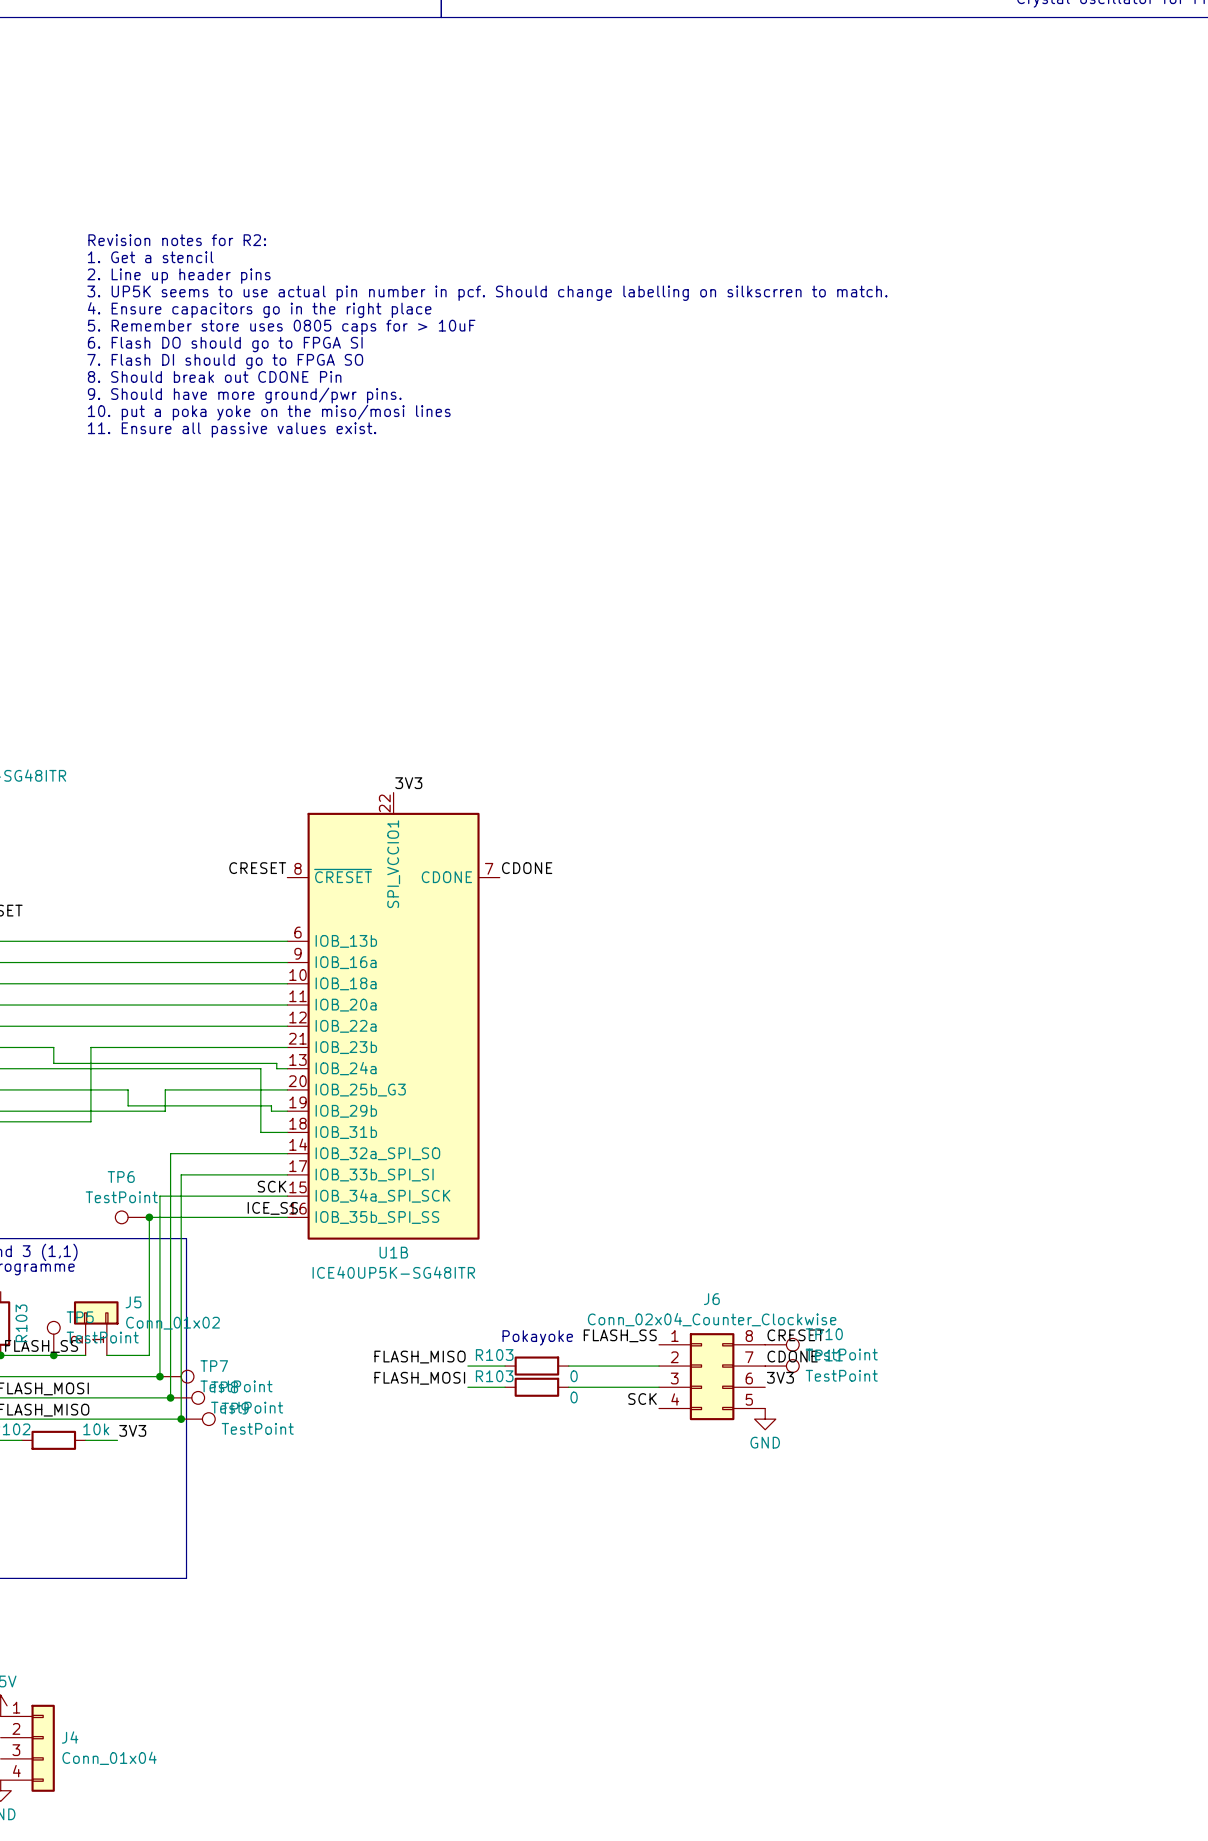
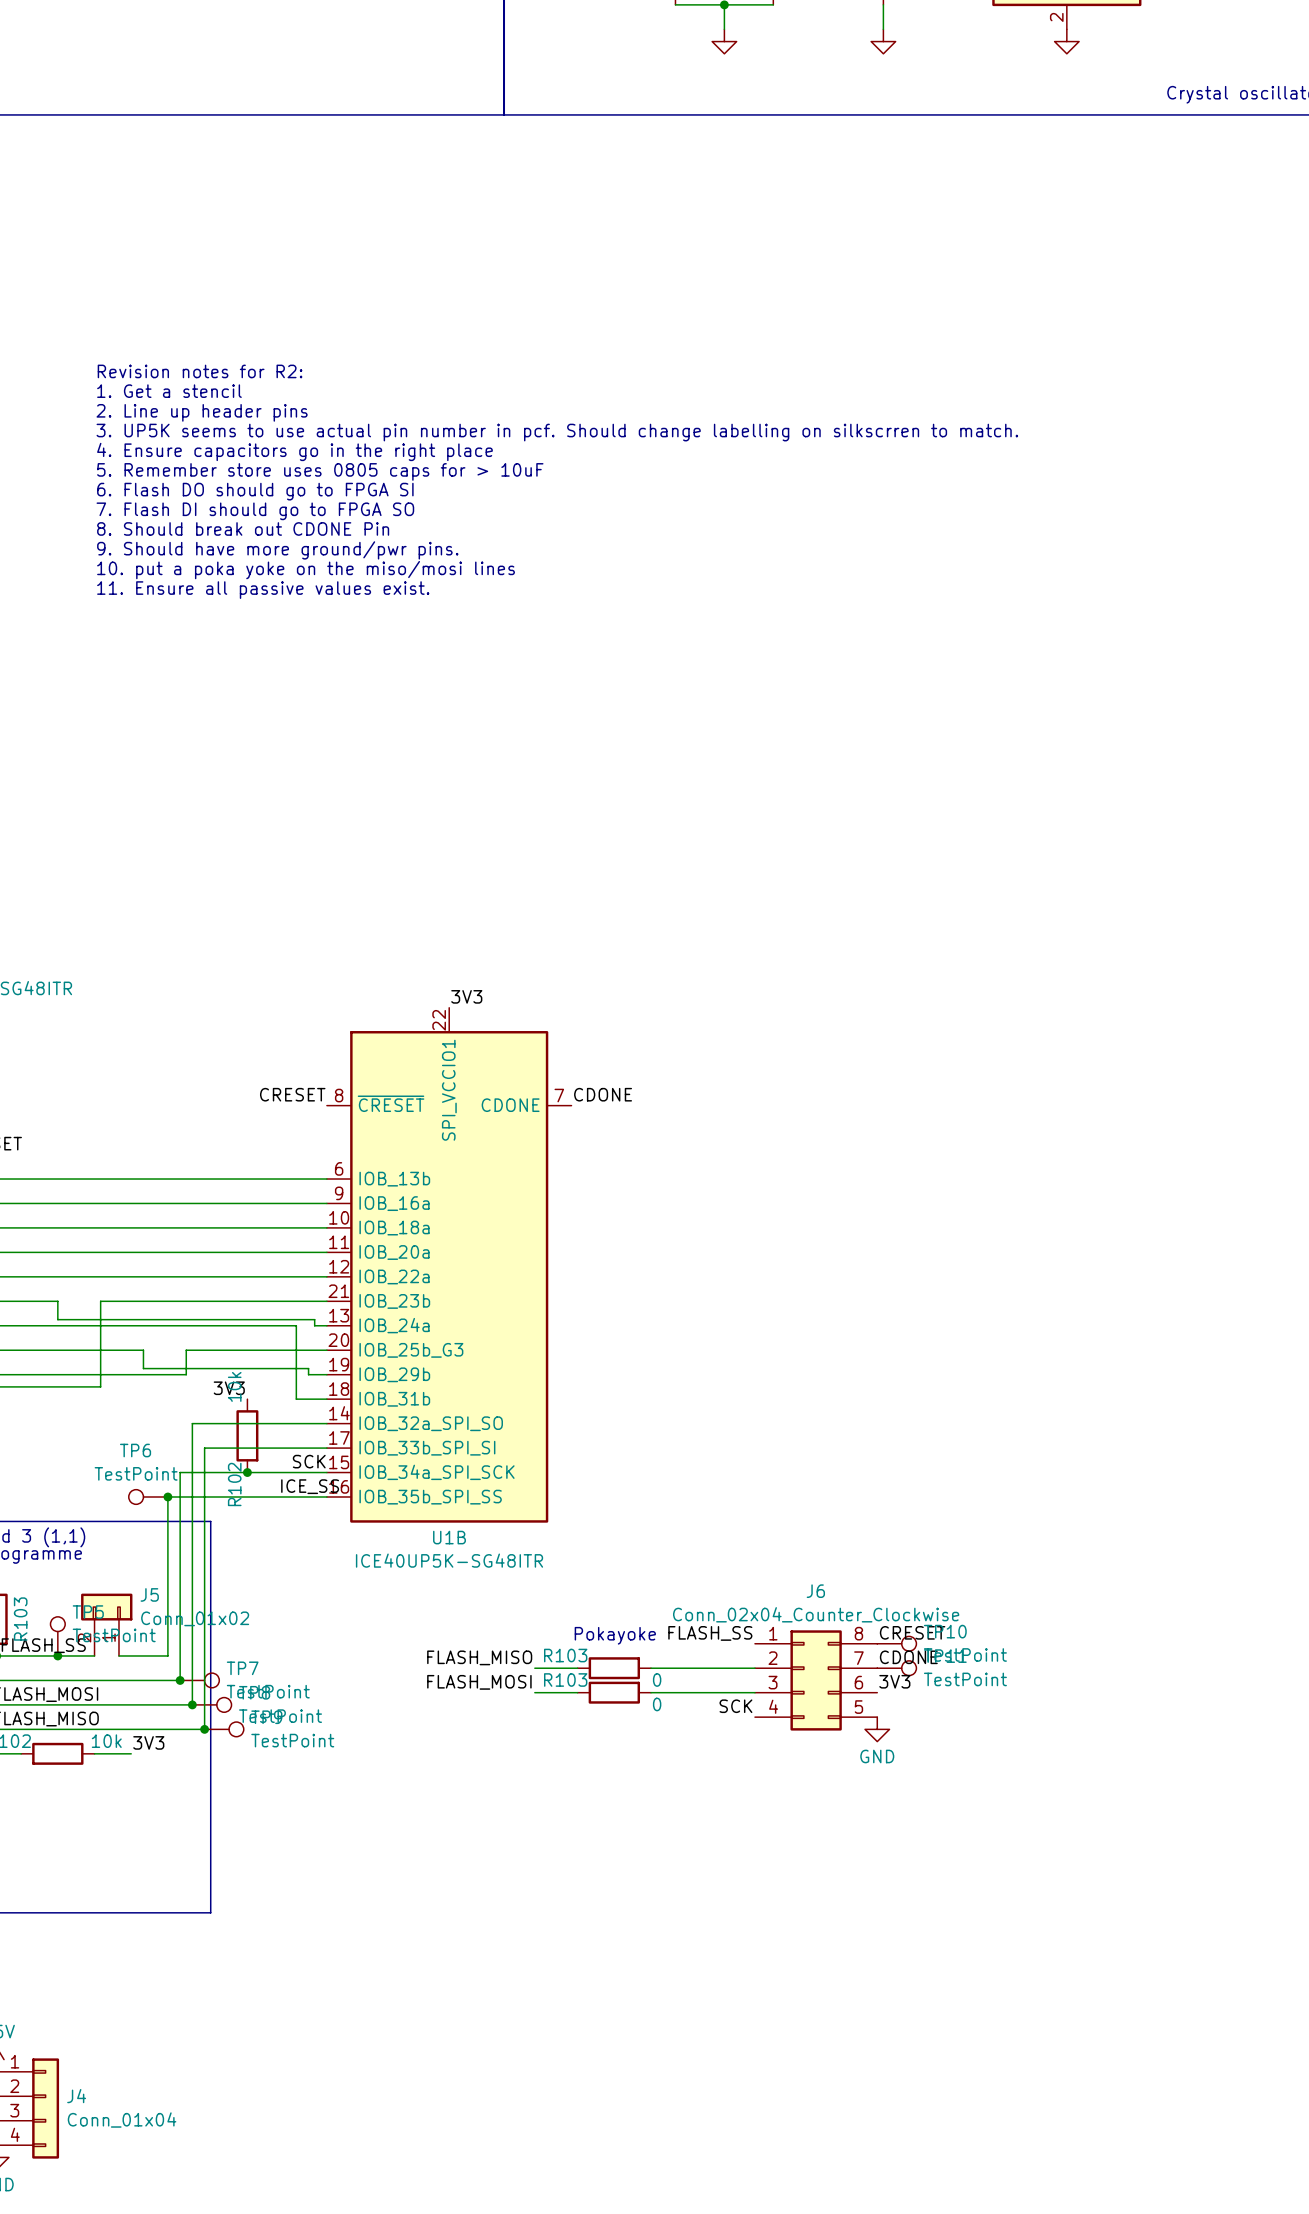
label: none -> 3V3 (229, 1388)
R102: none -> 10k (247, 1435)
junction: none -> (247, 1472)

